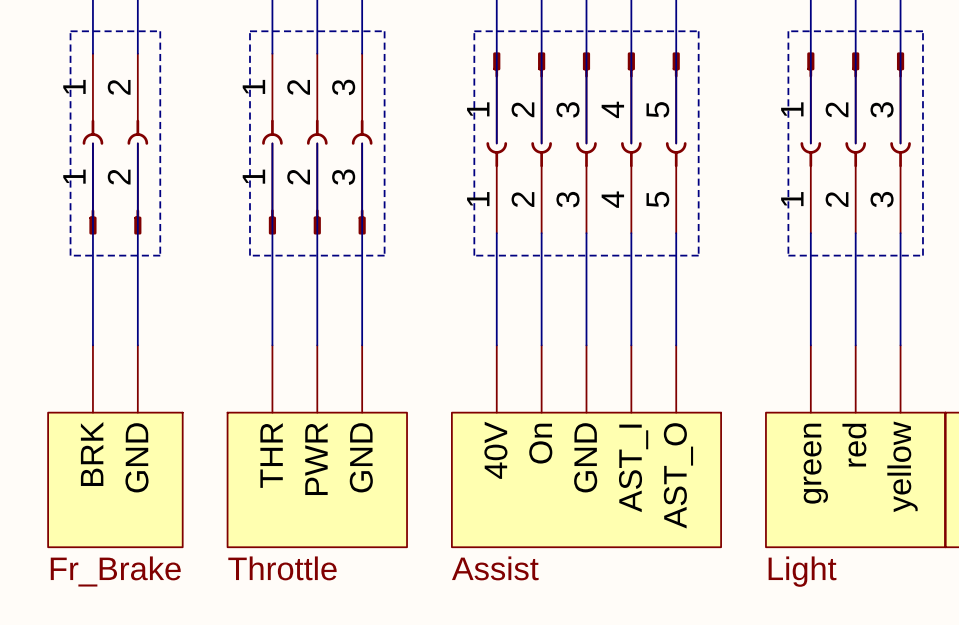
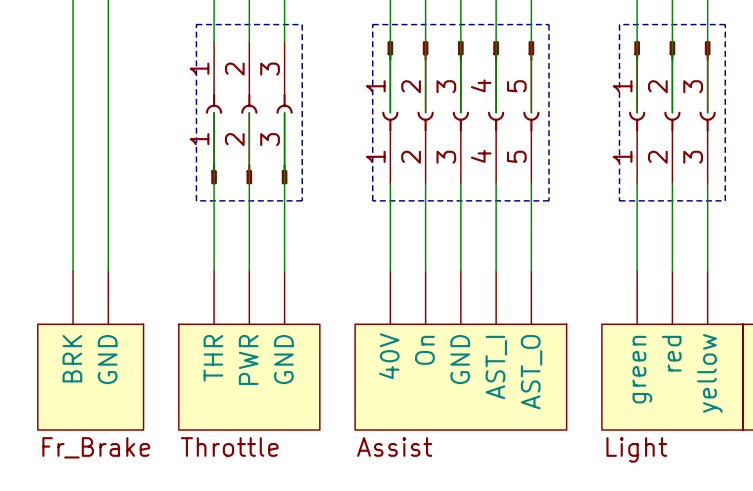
line: (70, 31) (160, 31) (160, 255) (70, 255) (70, 31) -> none
part: (115, 99) -> none
part: (115, 188) -> none

